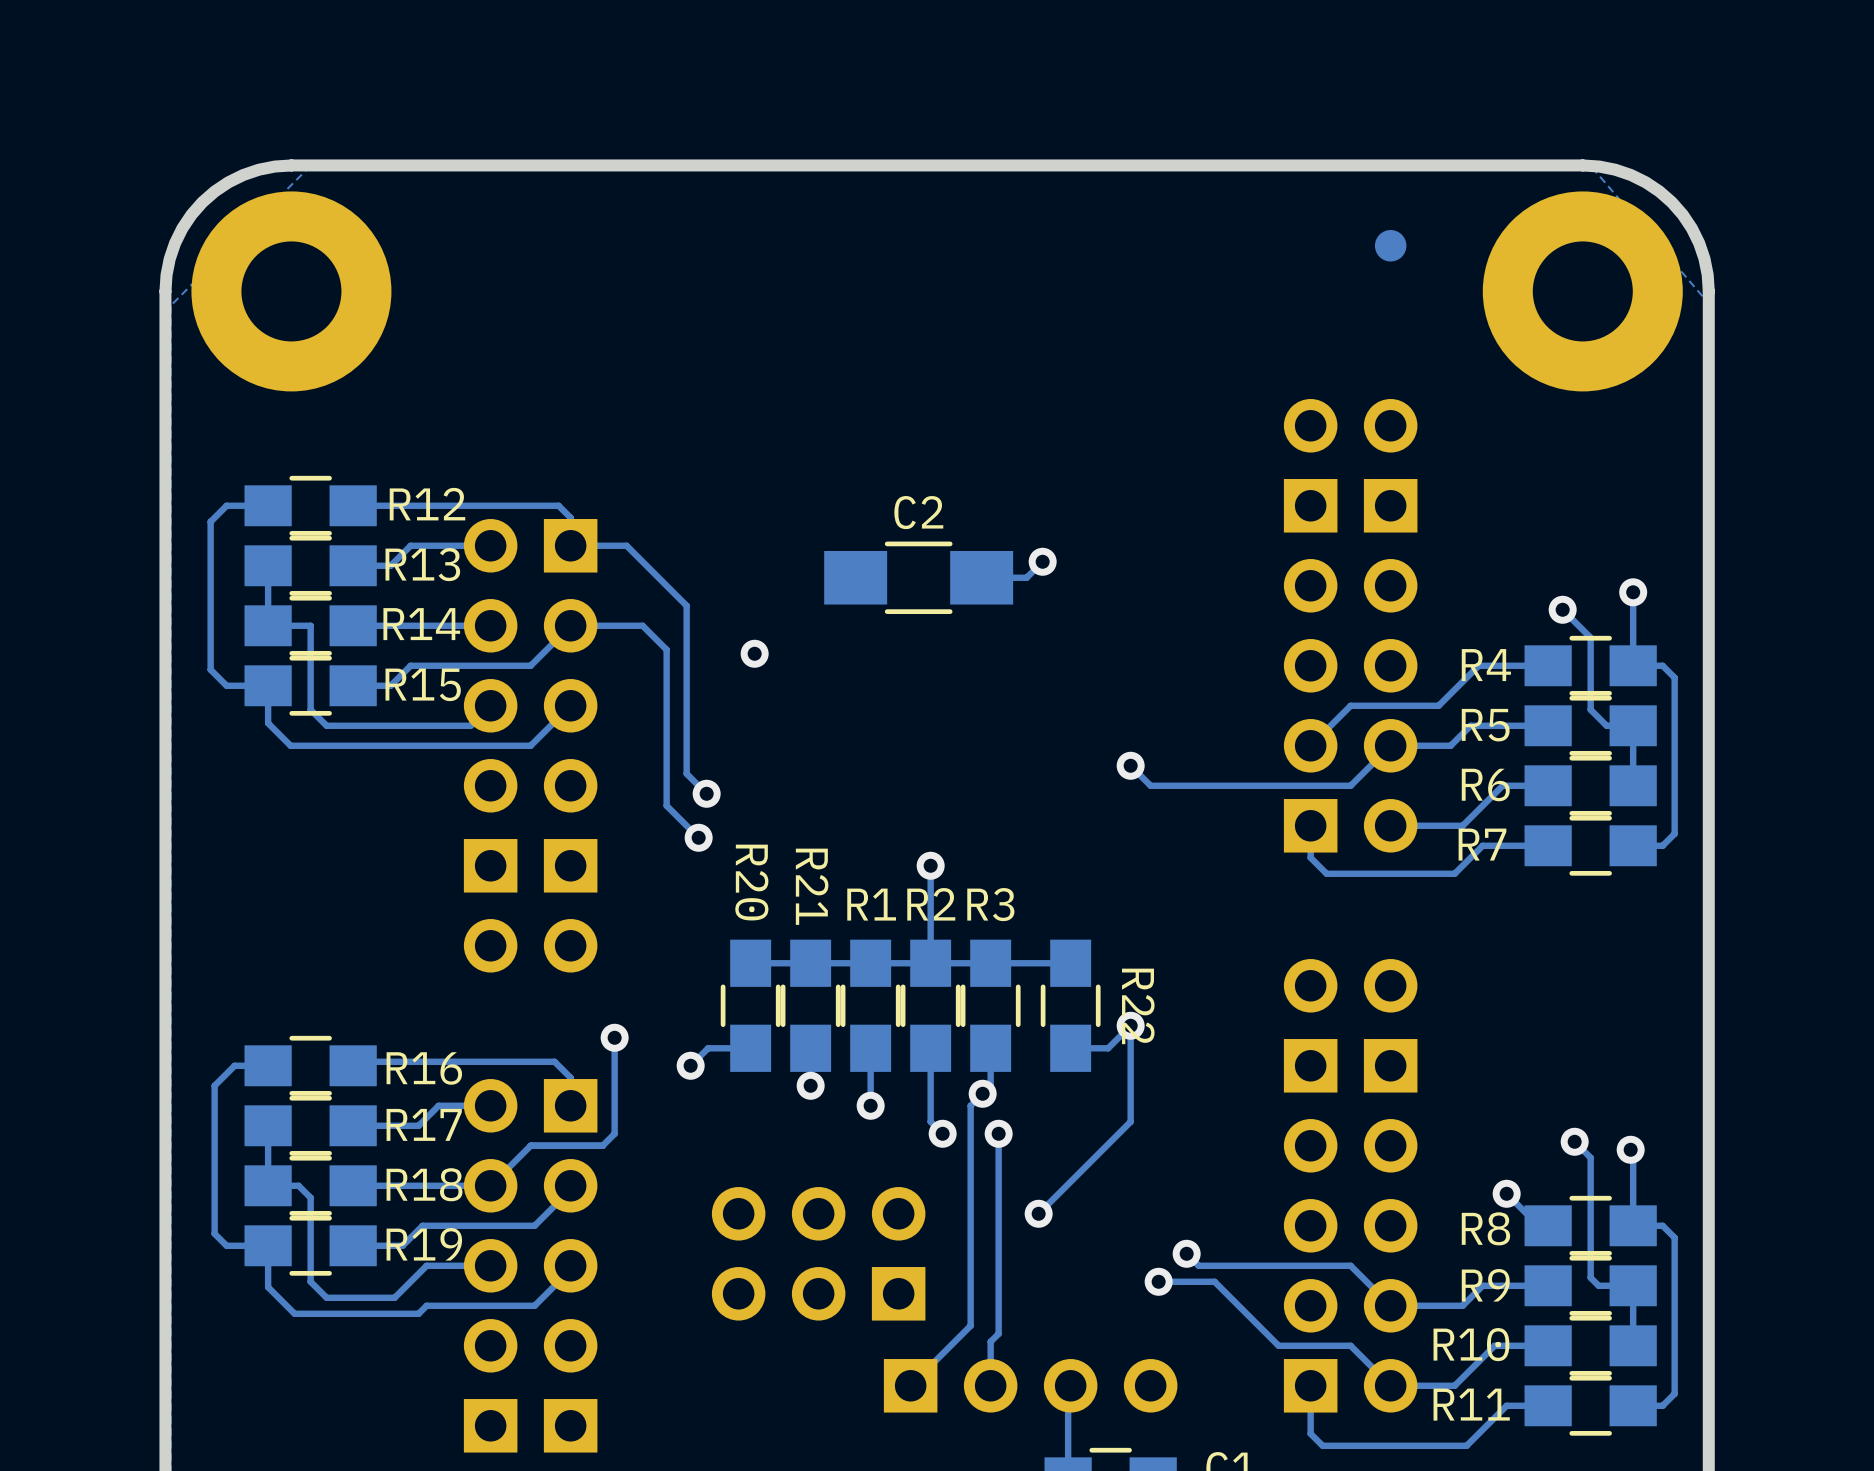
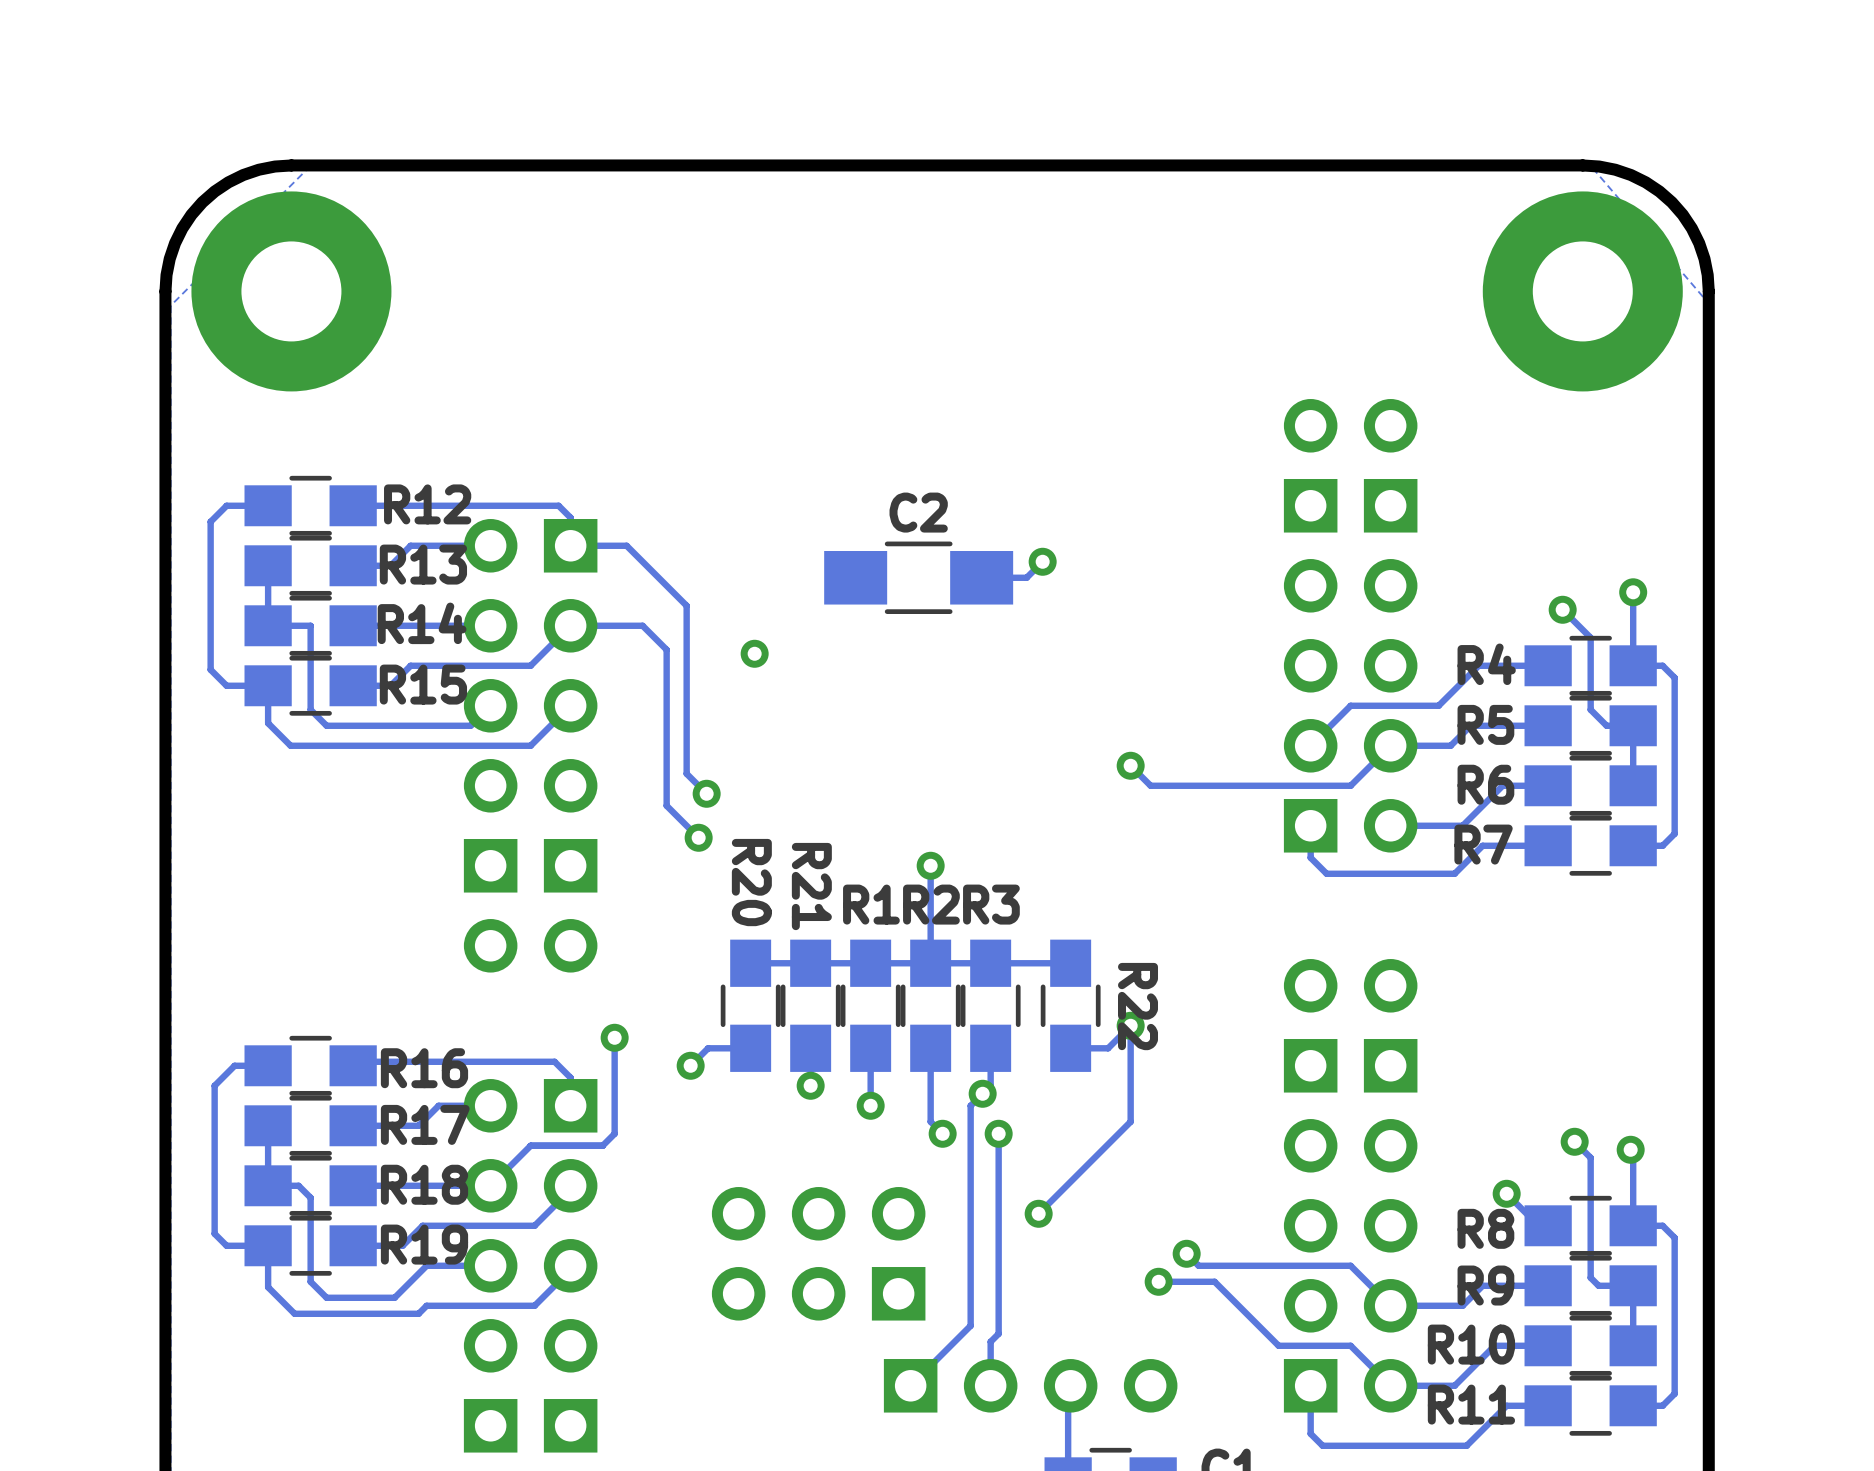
part: (1390, 245) -> none

